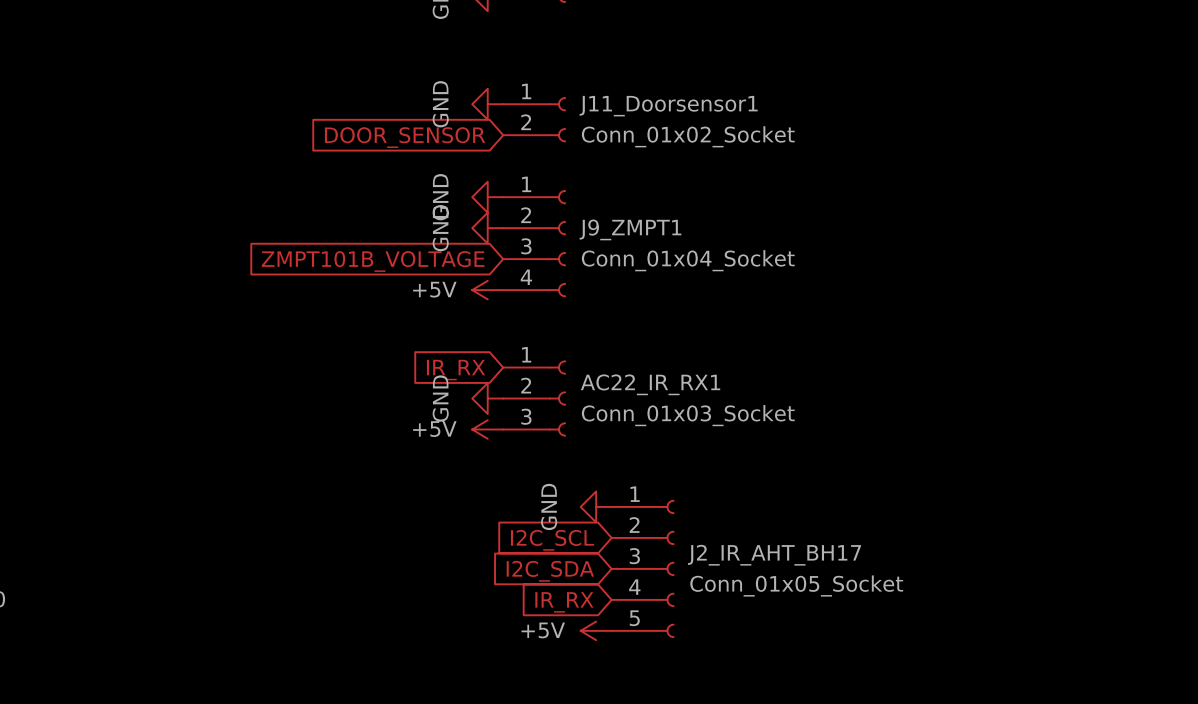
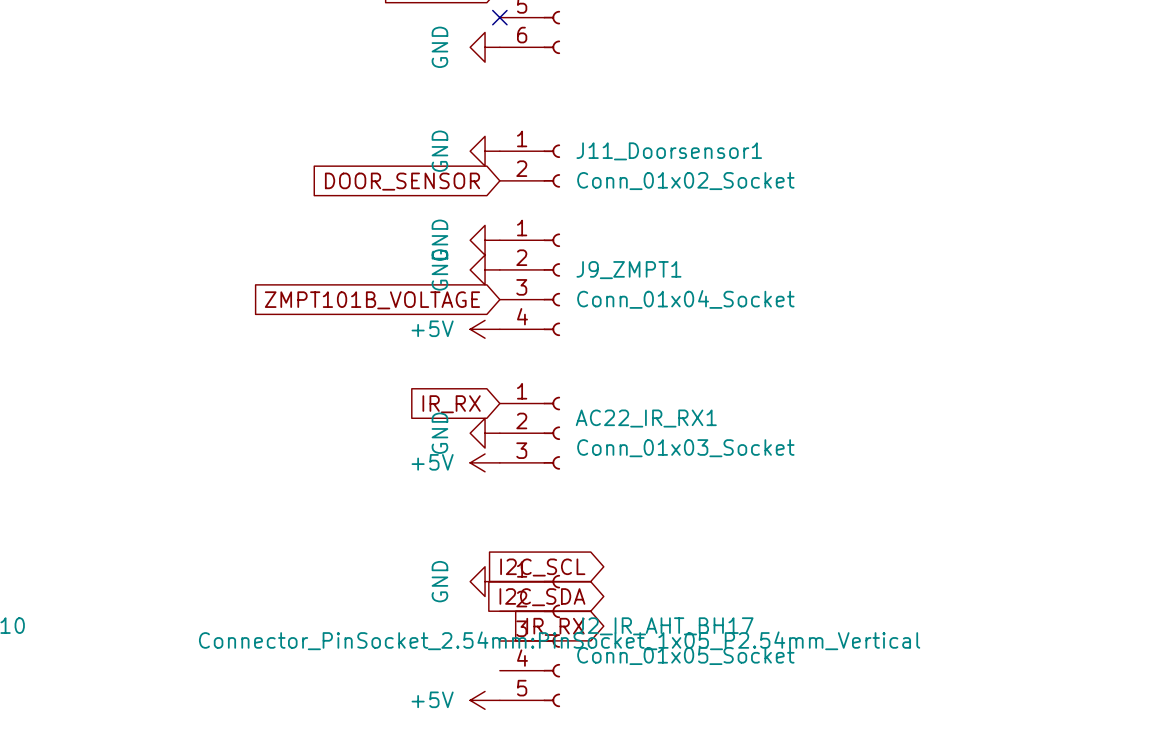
power symbol position: GND (596, 506) -> GND (485, 581)
J2_IR_AHT_BH17 position: (643, 568) -> (530, 641)
J2_IR_AHT_BH17 text: none -> Connector_PinSocket_2.54mm:PinSocket_1x05_P2.54mm_Vertical (559, 640)
power symbol position: +5V (596, 630) -> +5V (485, 700)

